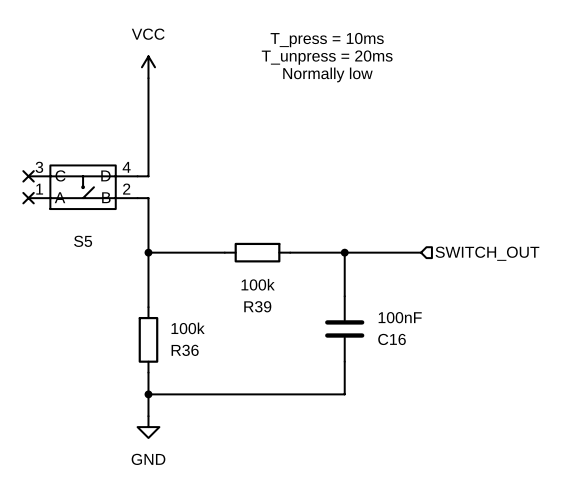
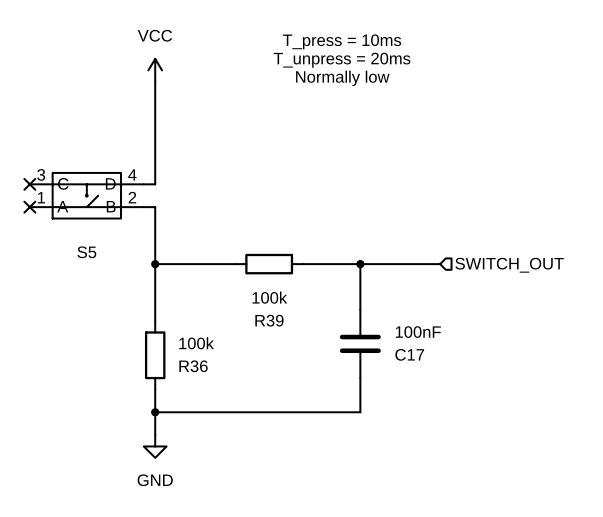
C16 name: C16 (392, 339) -> C17 (409, 354)

